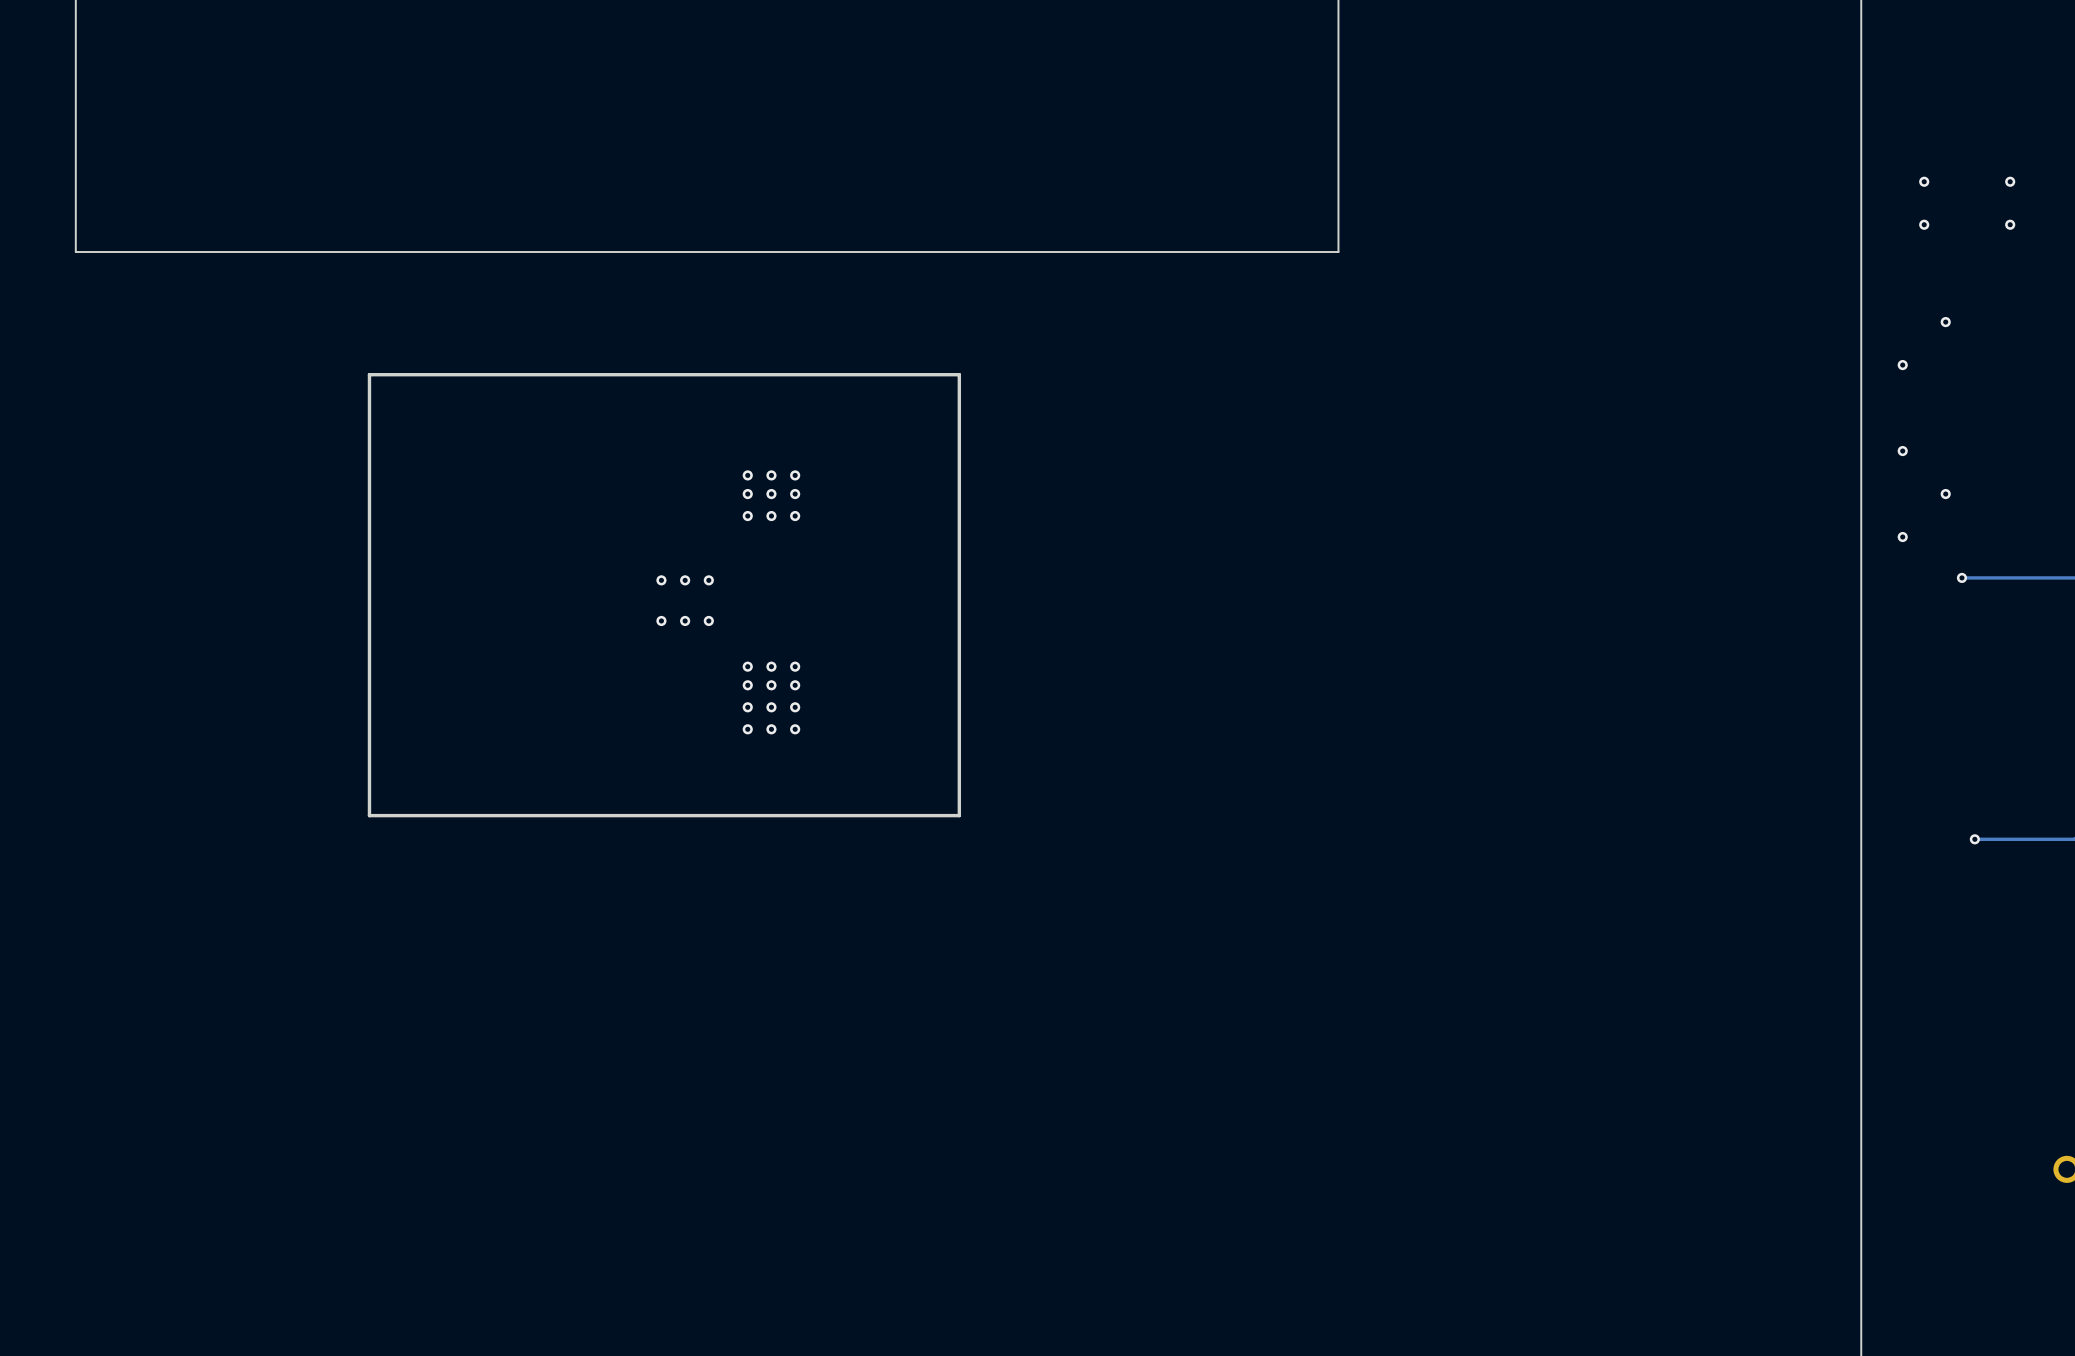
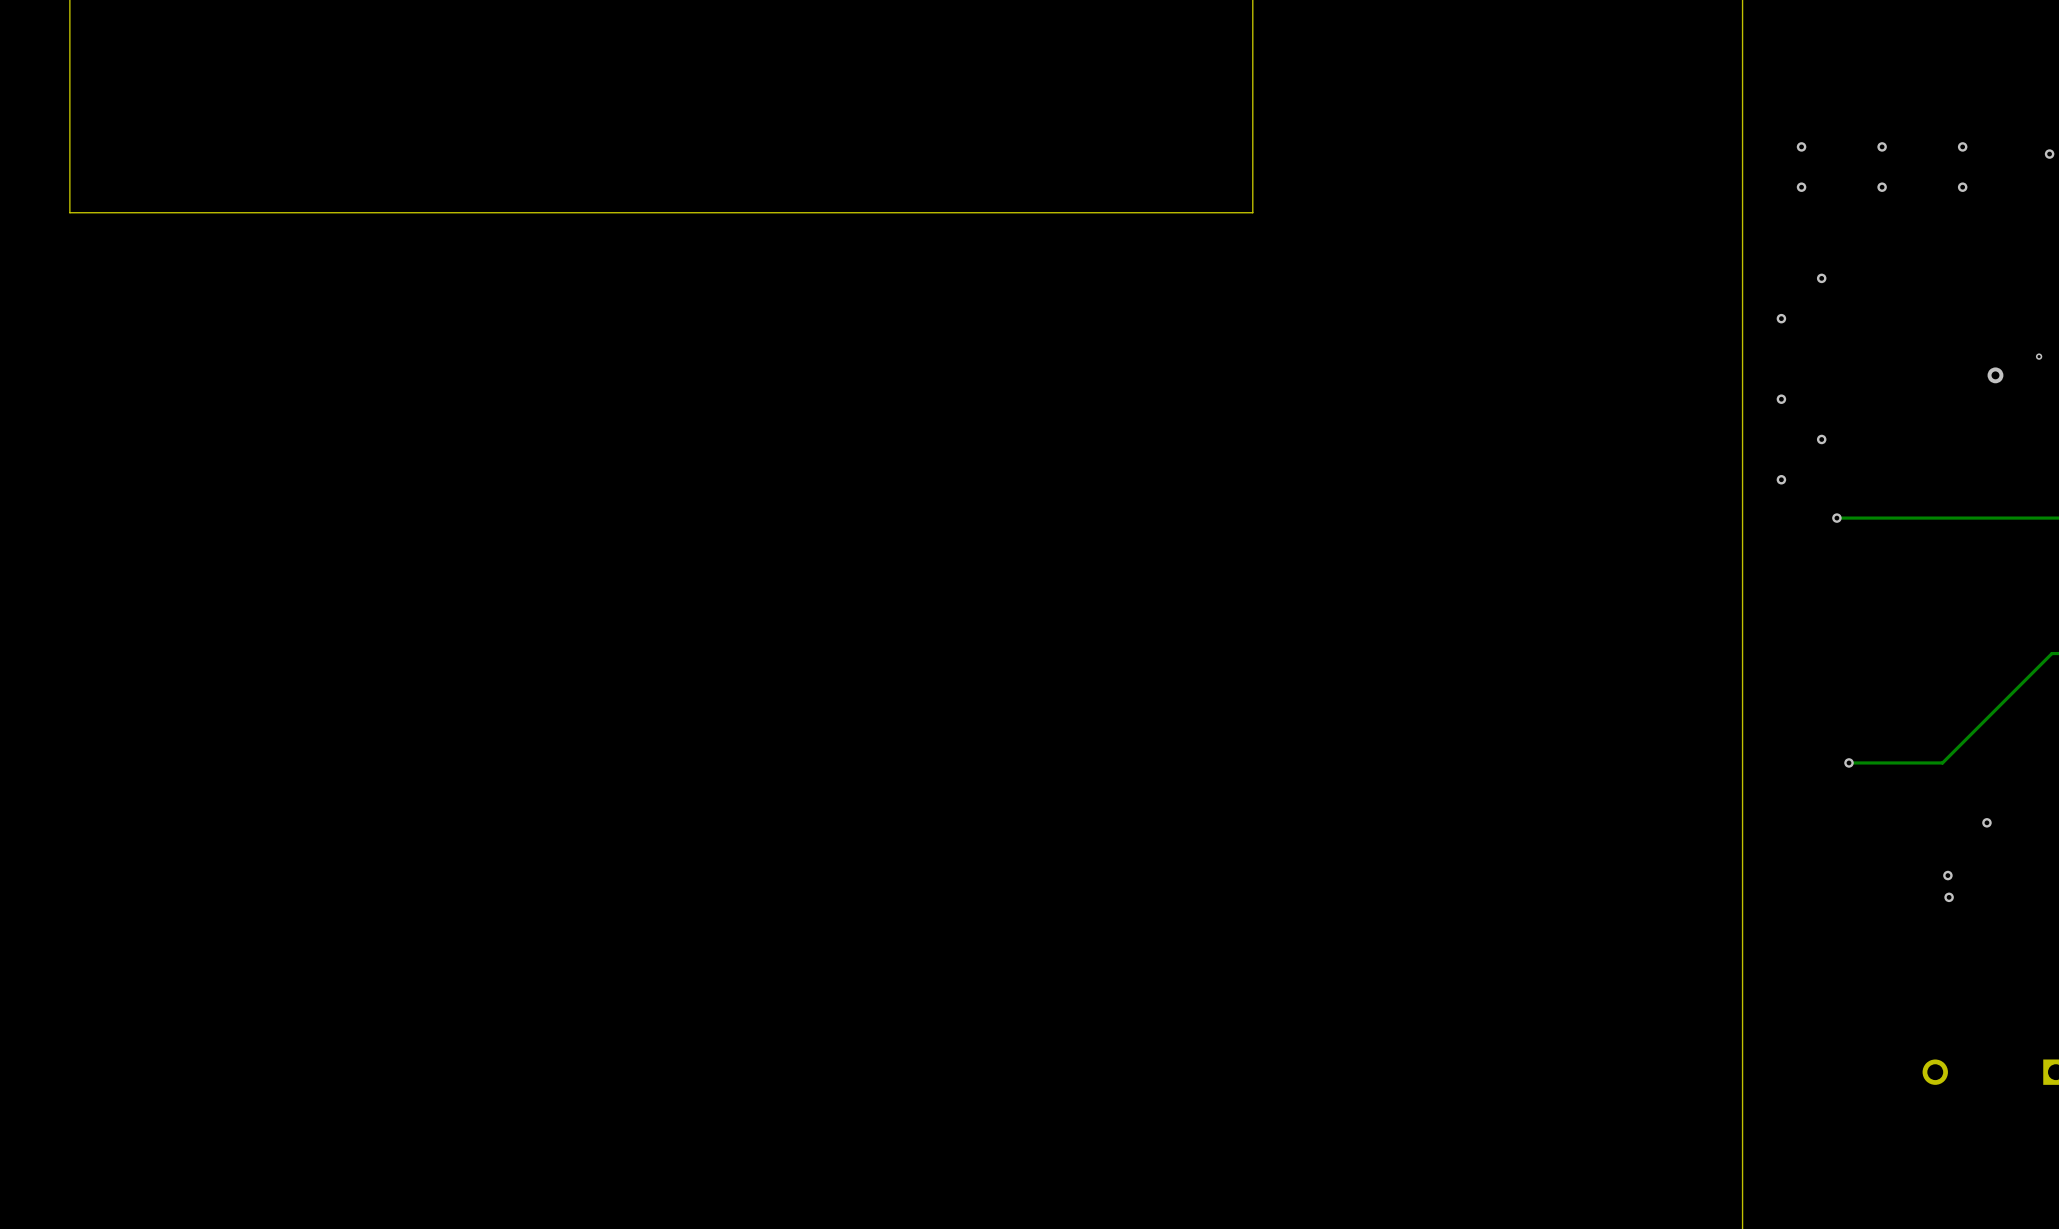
board edge: (959, 374) (369, 374) (369, 815) (959, 815) (959, 374) -> none
via: (747, 475) -> none
via: (771, 475) -> none
via: (795, 475) -> none
via: (747, 494) -> none
via: (771, 494) -> none
via: (795, 494) -> none
via: (747, 516) -> none
via: (771, 516) -> none
via: (795, 516) -> none
via: (661, 580) -> none
via: (685, 580) -> none
via: (708, 580) -> none
via: (661, 620) -> none
via: (685, 620) -> none
via: (708, 620) -> none
via: (747, 666) -> none
via: (771, 666) -> none
via: (795, 666) -> none
via: (747, 685) -> none
via: (771, 685) -> none
via: (795, 685) -> none
via: (747, 707) -> none
via: (771, 707) -> none
via: (795, 707) -> none
via: (747, 729) -> none
via: (771, 729) -> none
via: (795, 729) -> none

